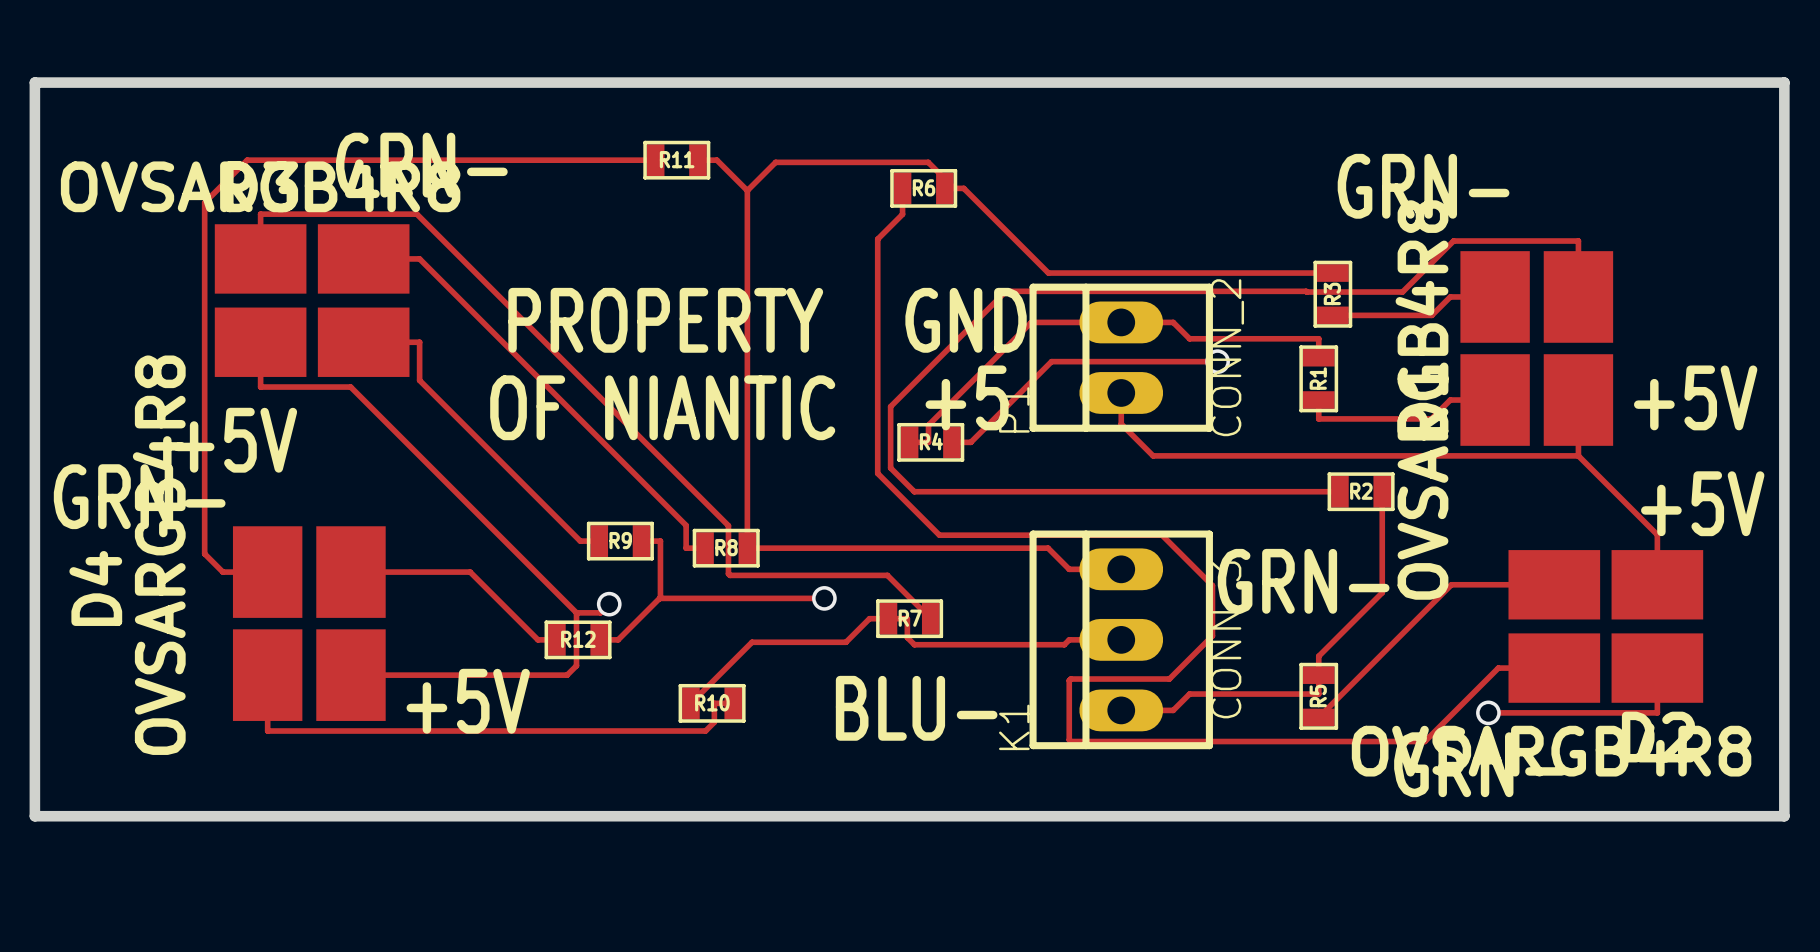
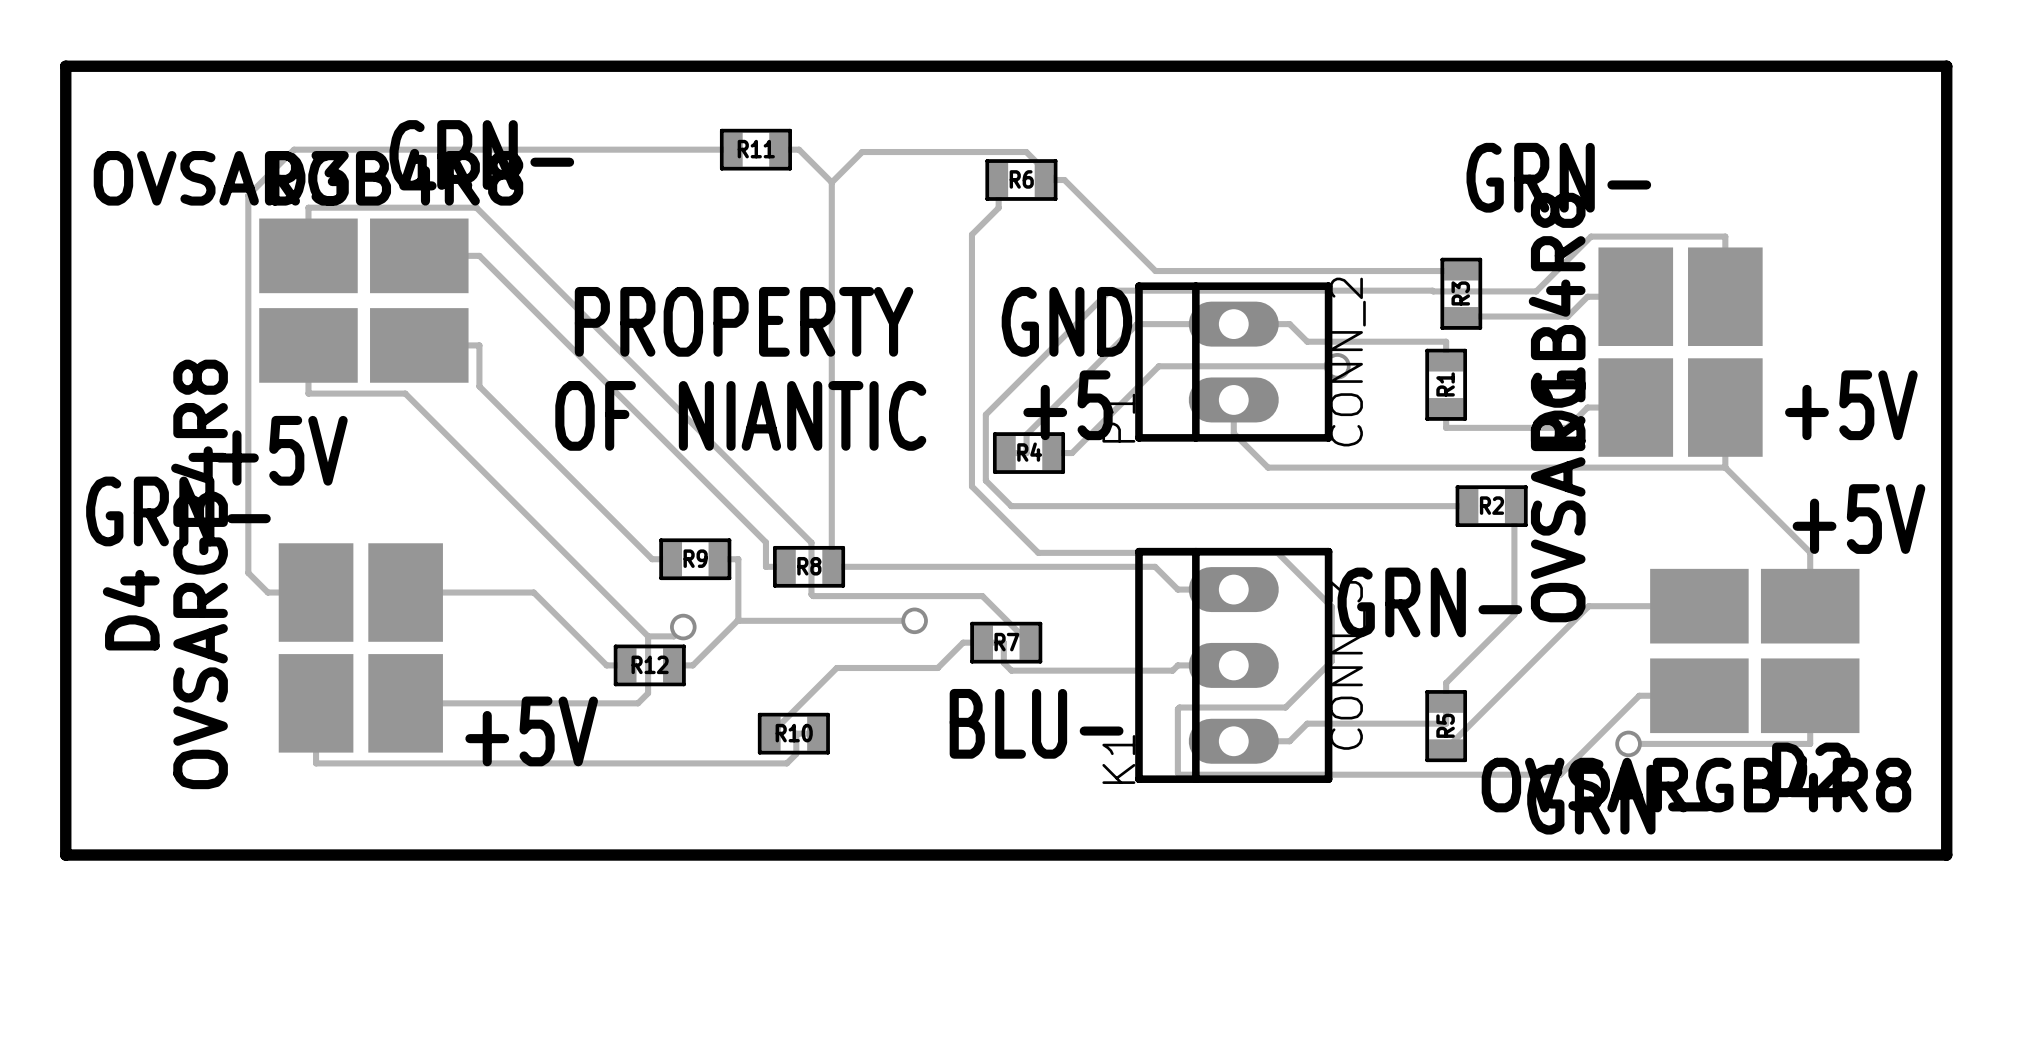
text position: BLU- (916, 708) -> BLU- (1036, 723)

